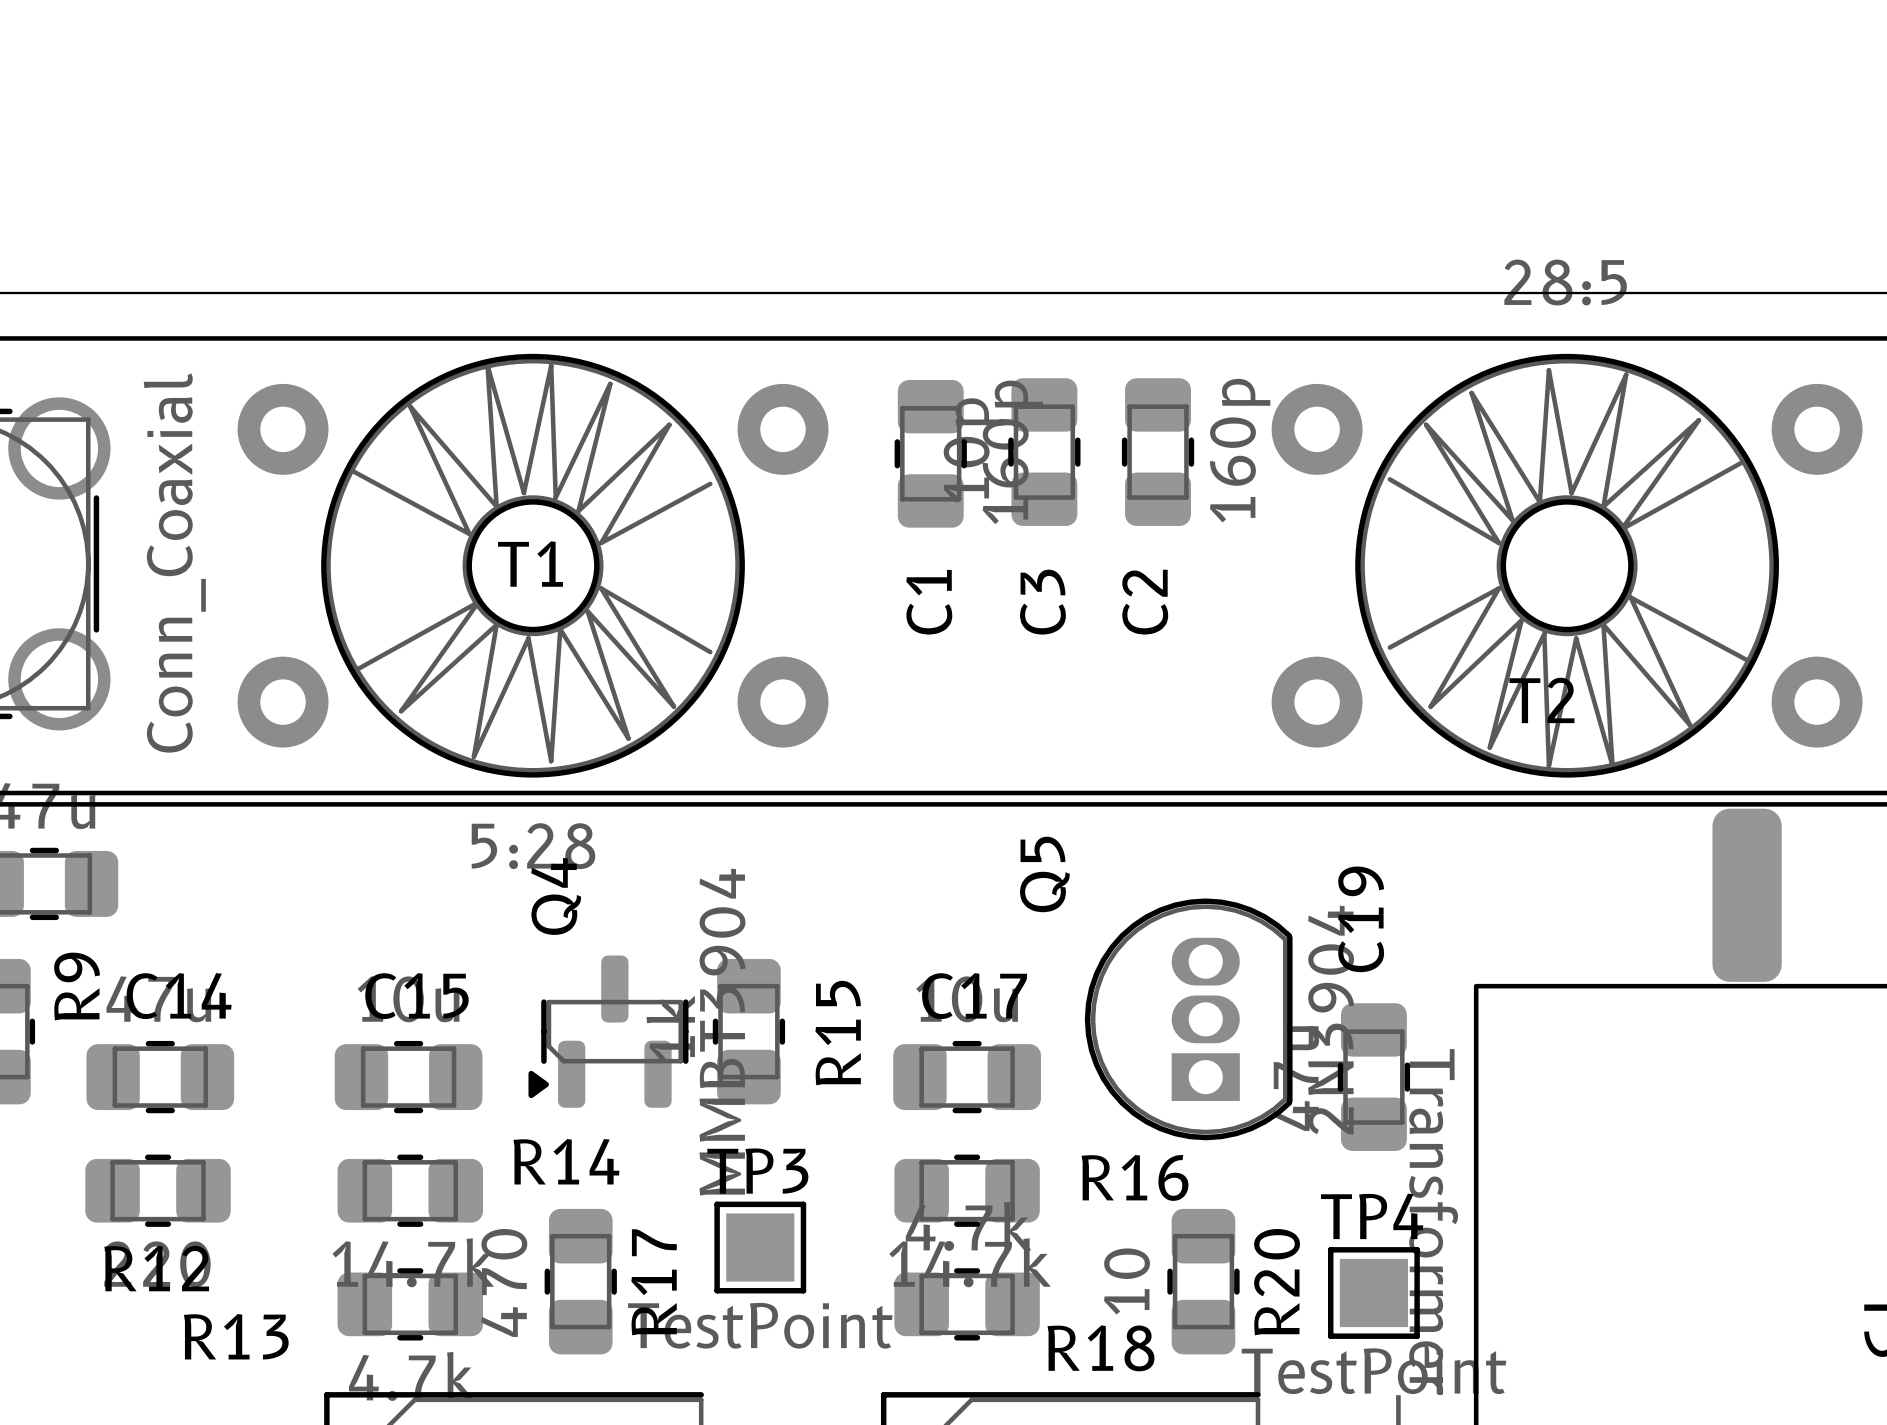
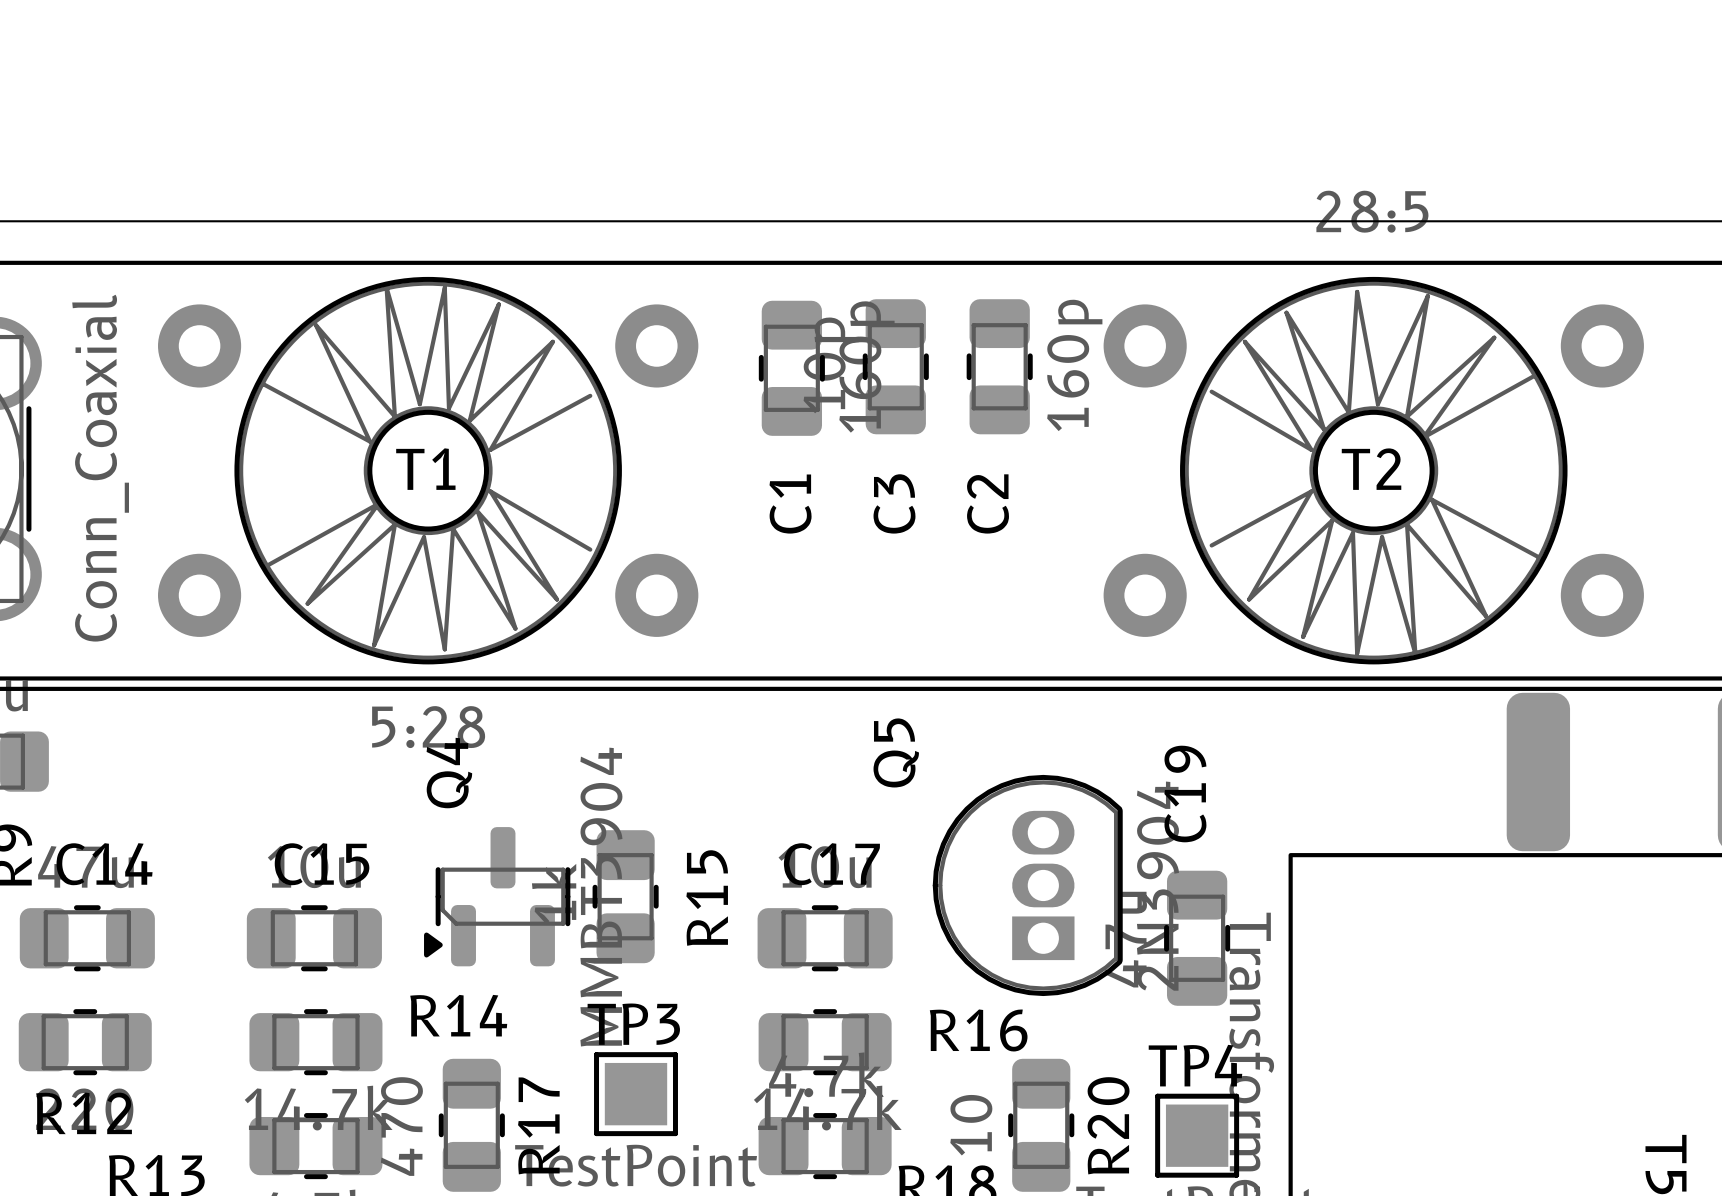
T2 name position: T2 (1541, 700) -> T2 (1371, 469)

